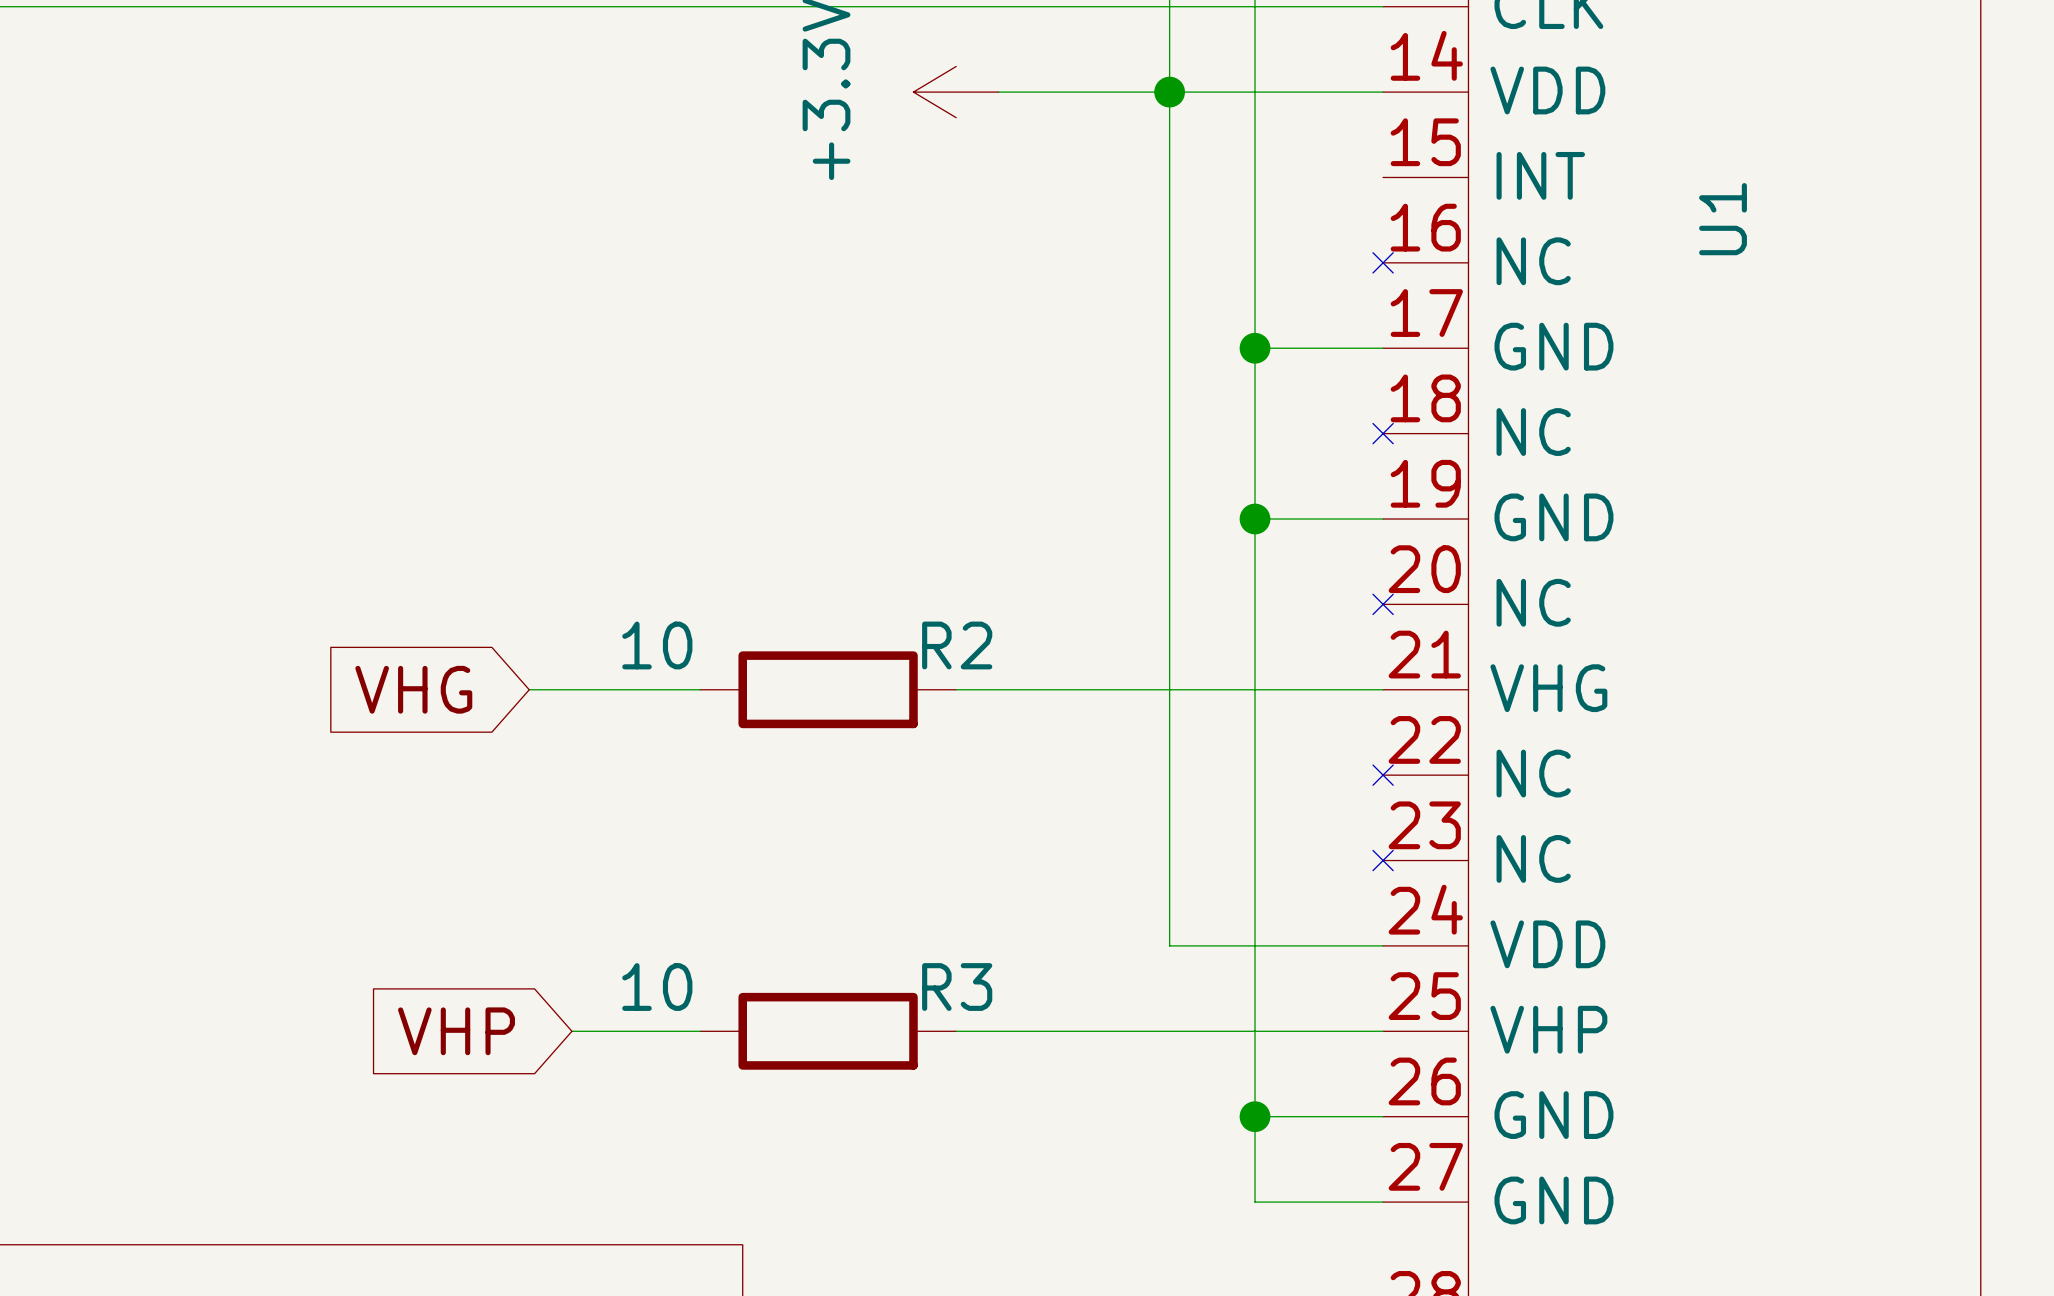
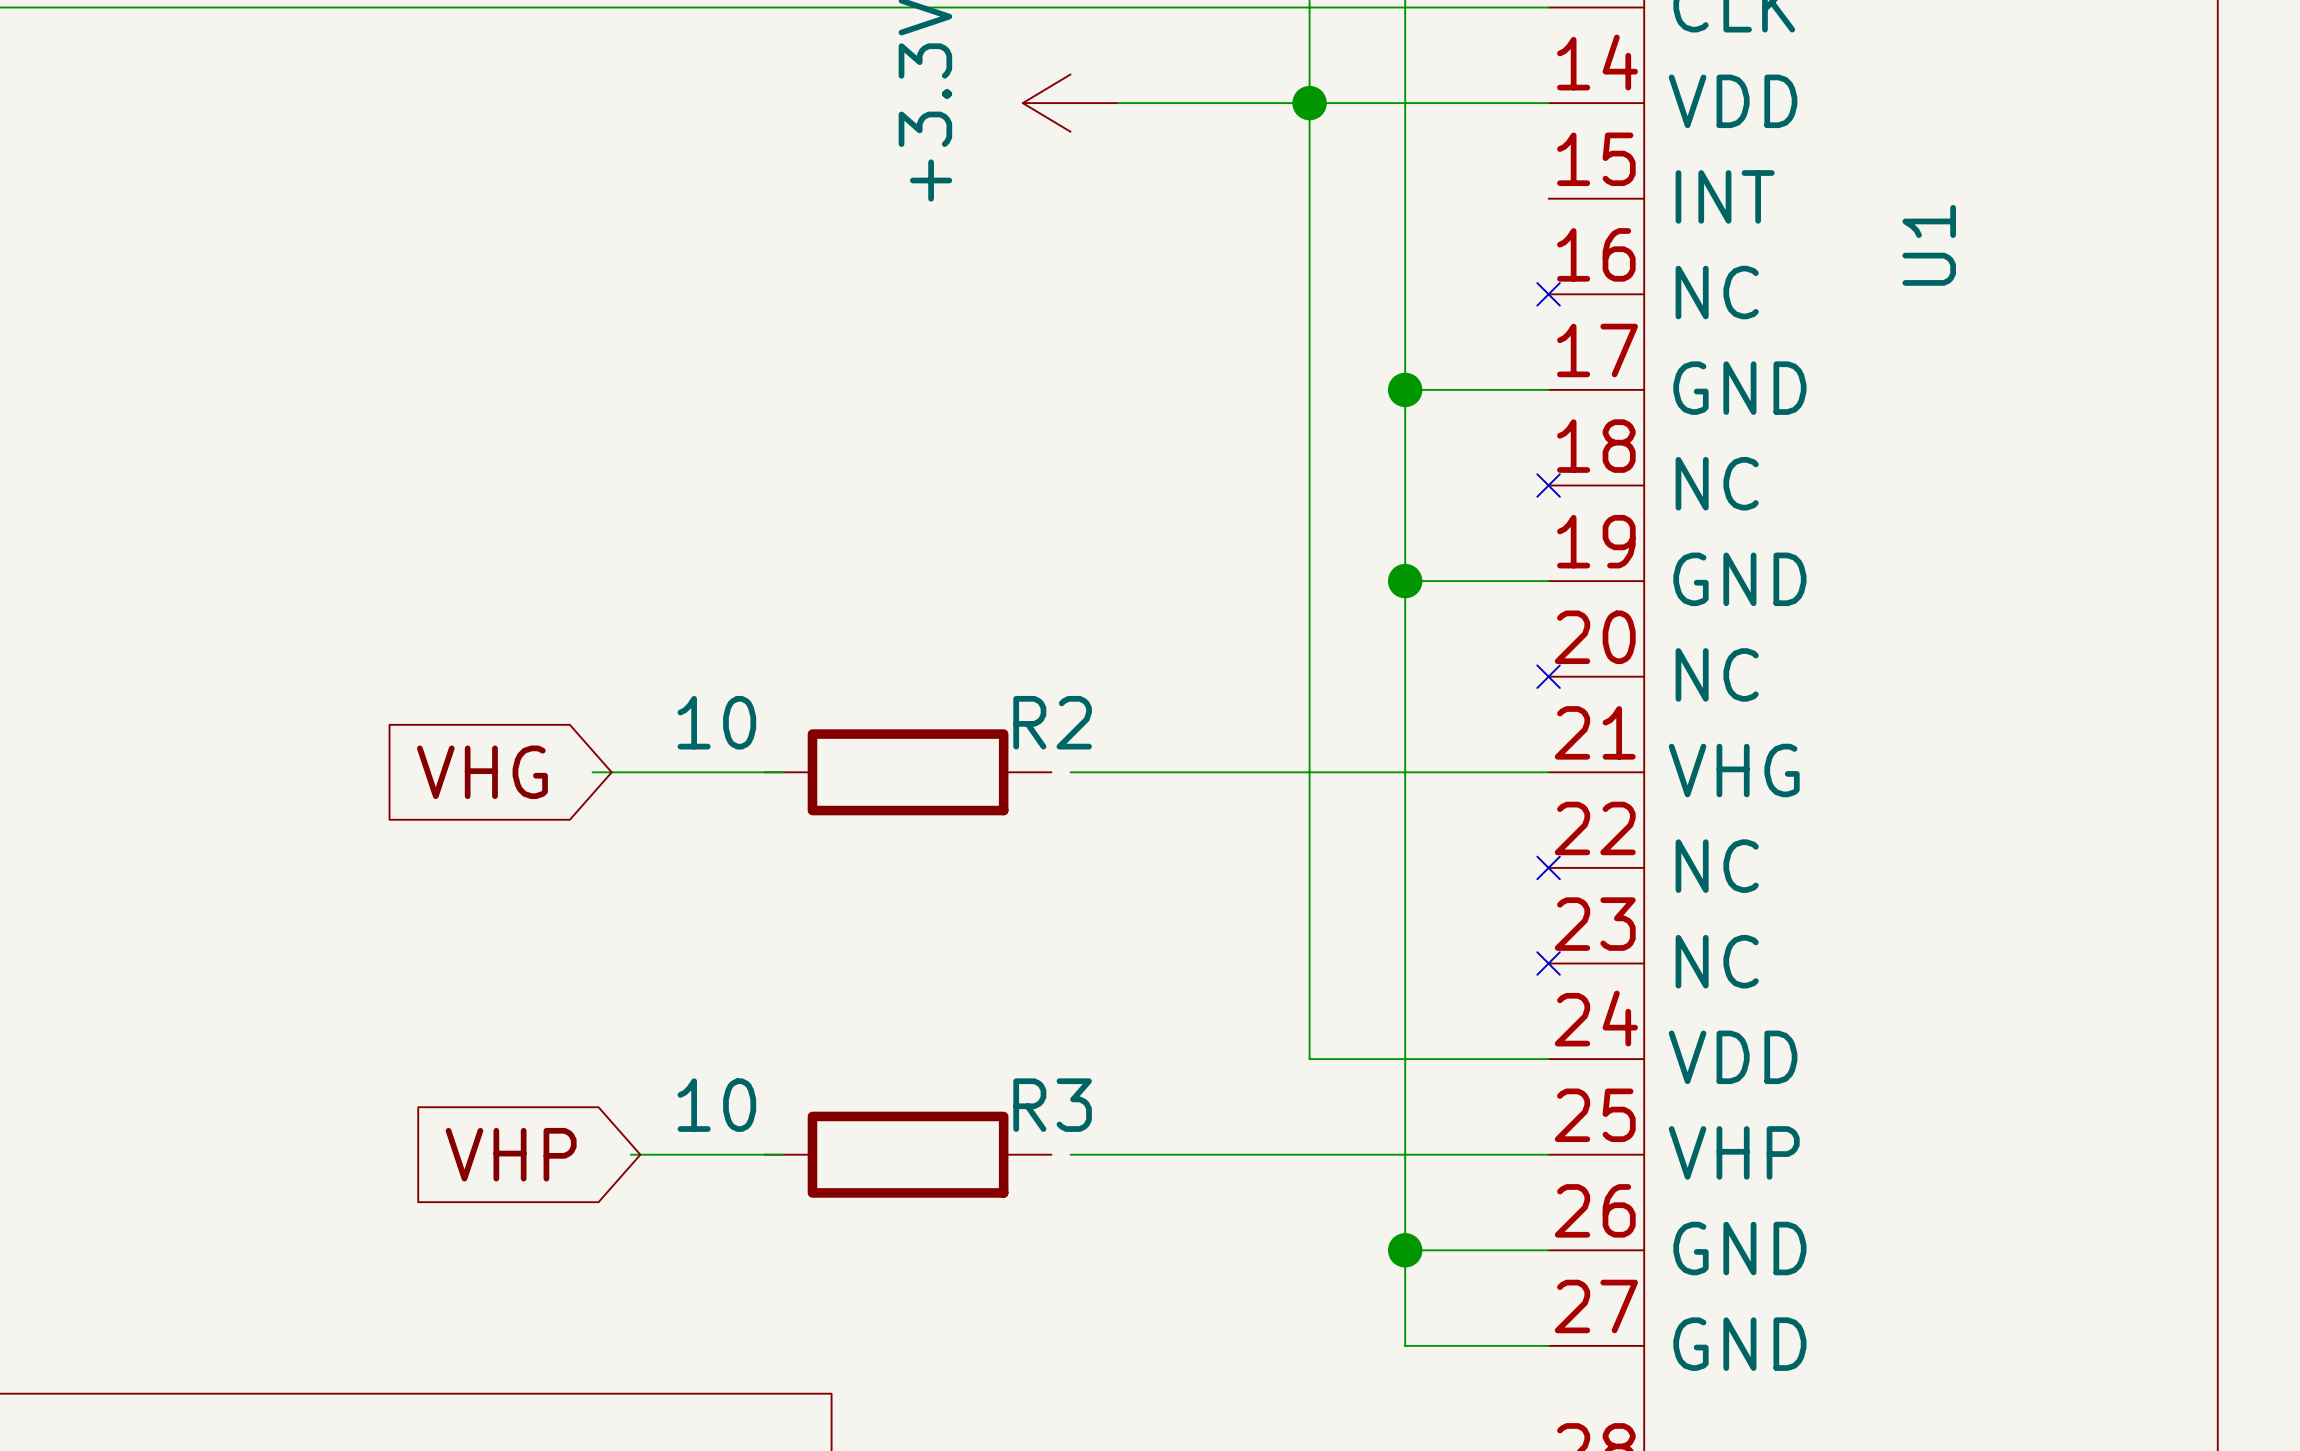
global label position: VHG (413, 689) -> VHG (482, 772)
R2 position: (828, 689) -> (908, 772)
wire: none -> (630, 1154) (640, 1154)
R3 position: (828, 1031) -> (908, 1154)

